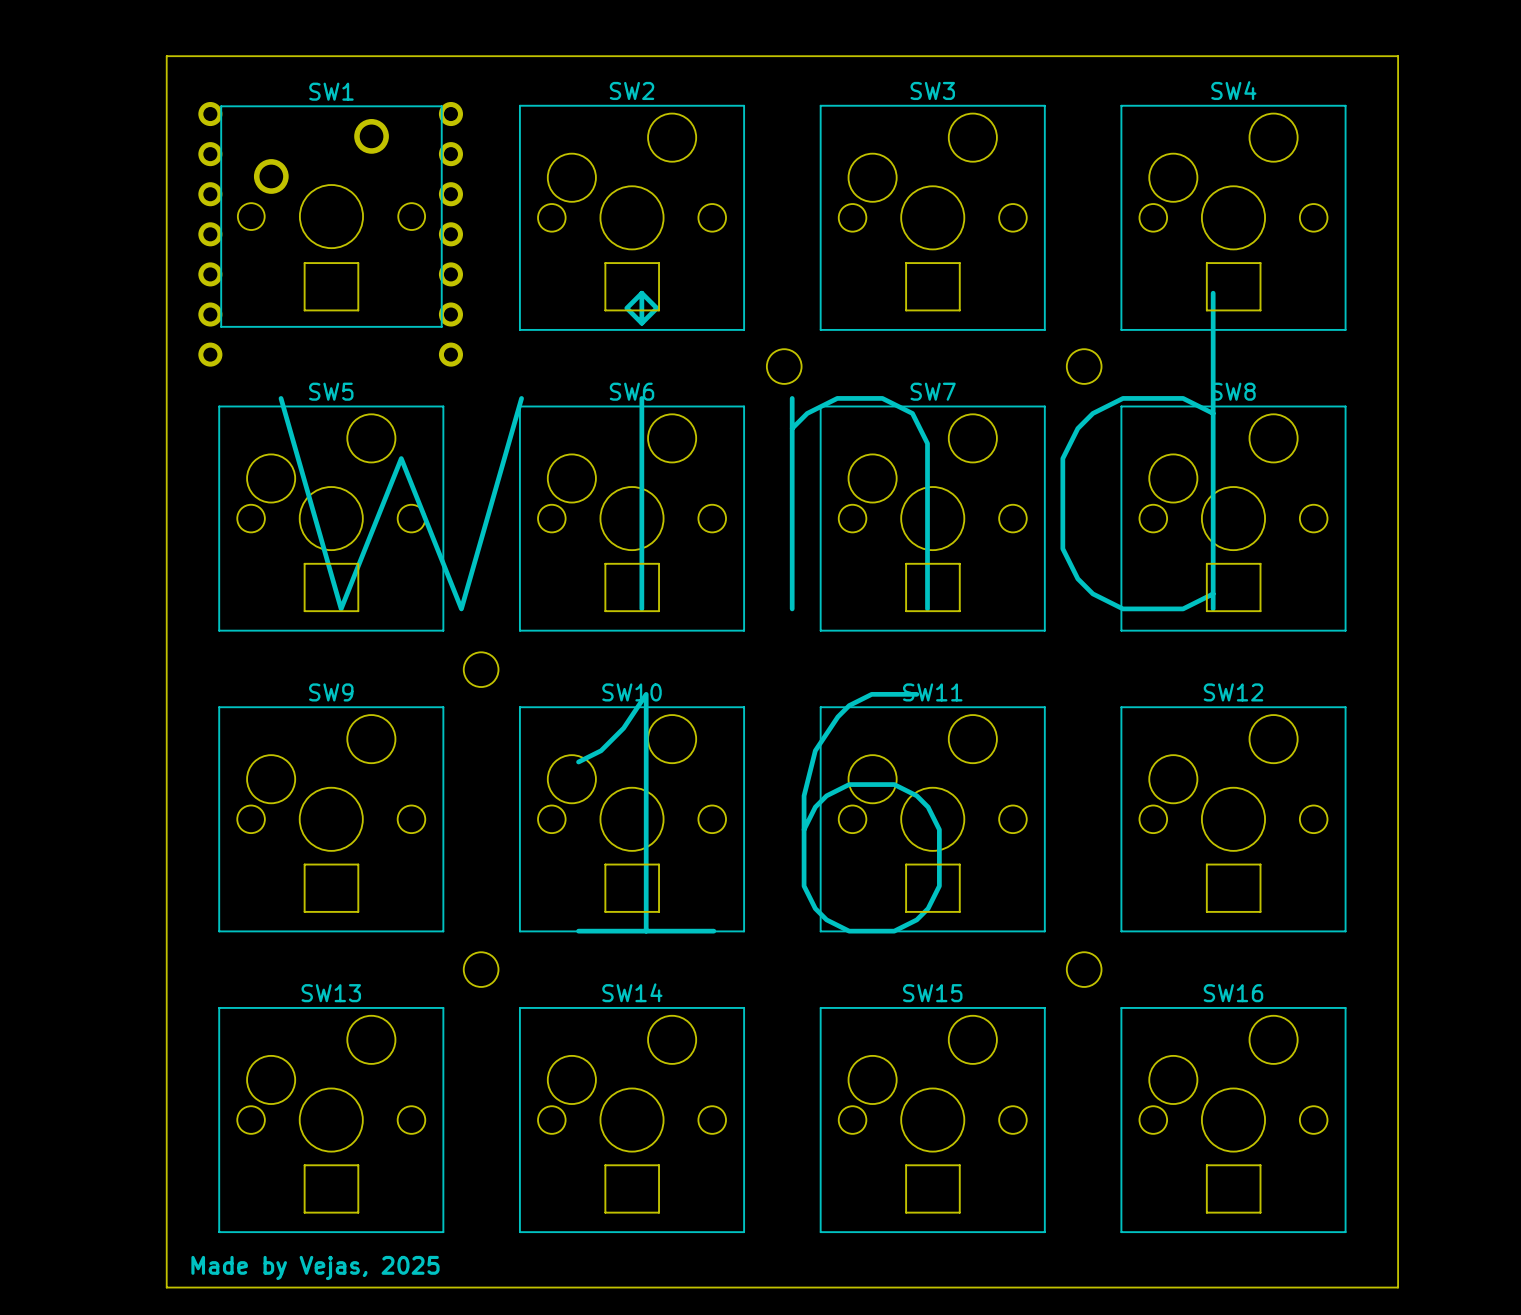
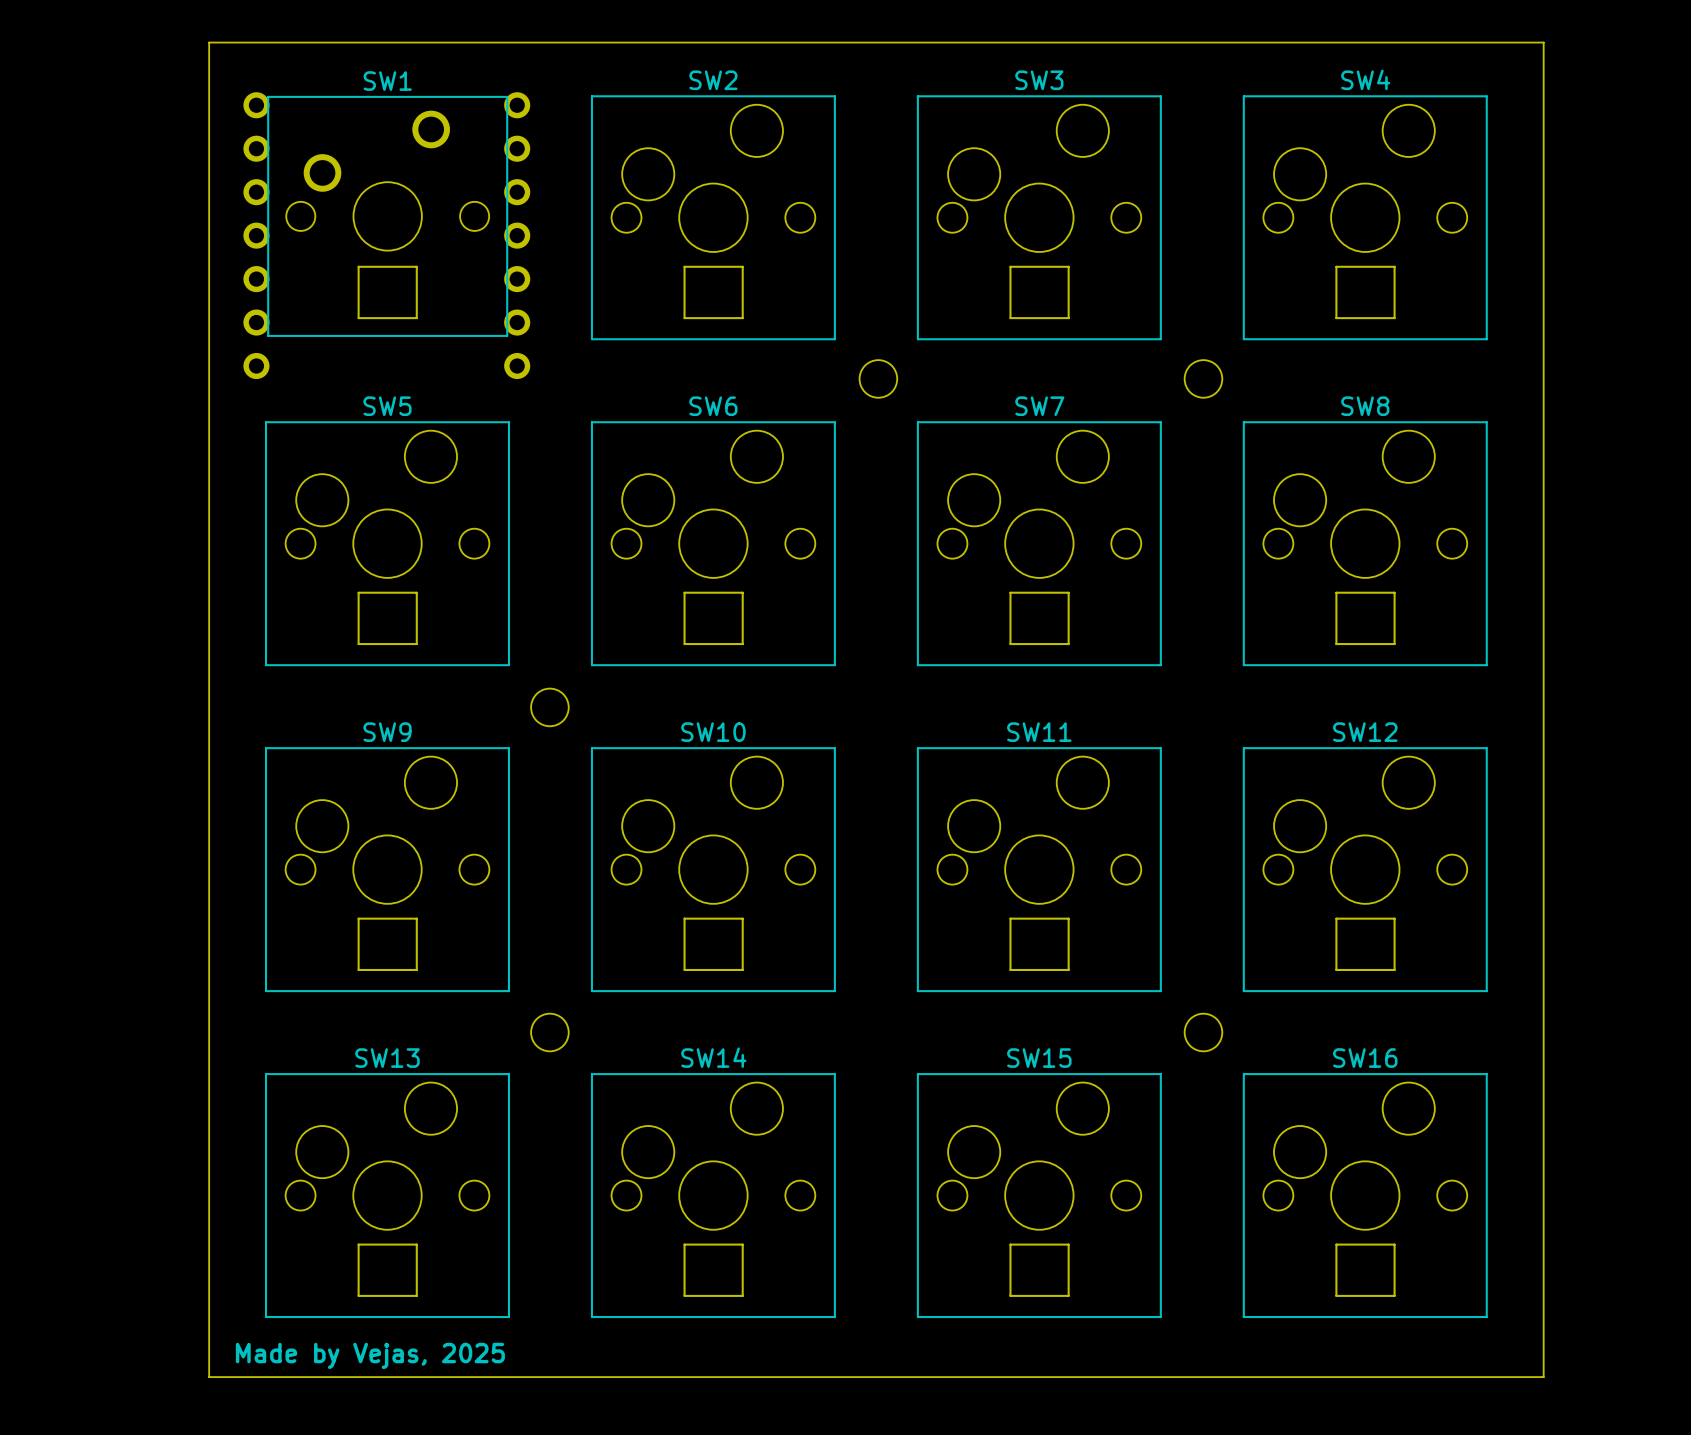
text: wind (747, 451) -> none
text: 16 (758, 812) -> none

